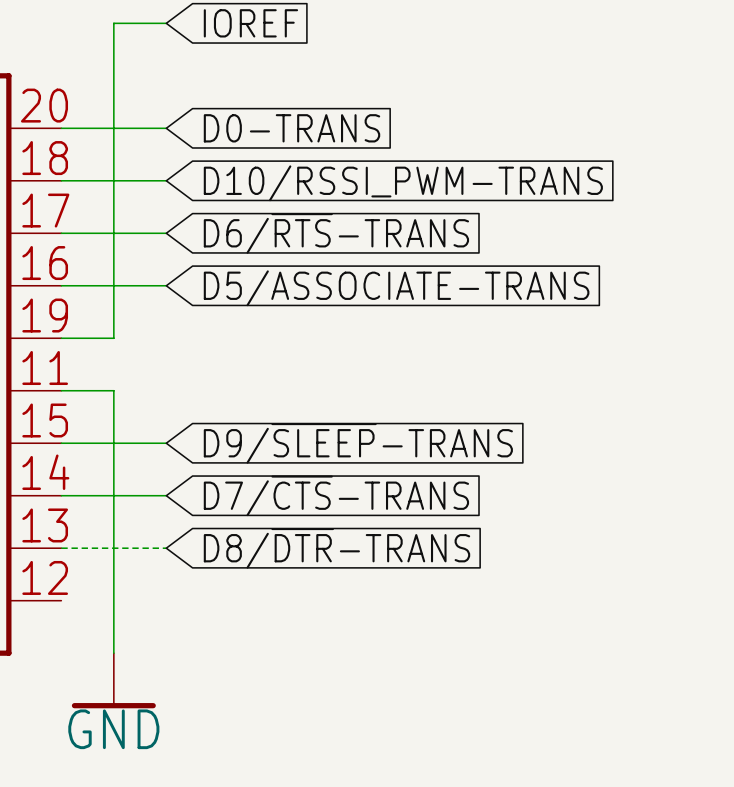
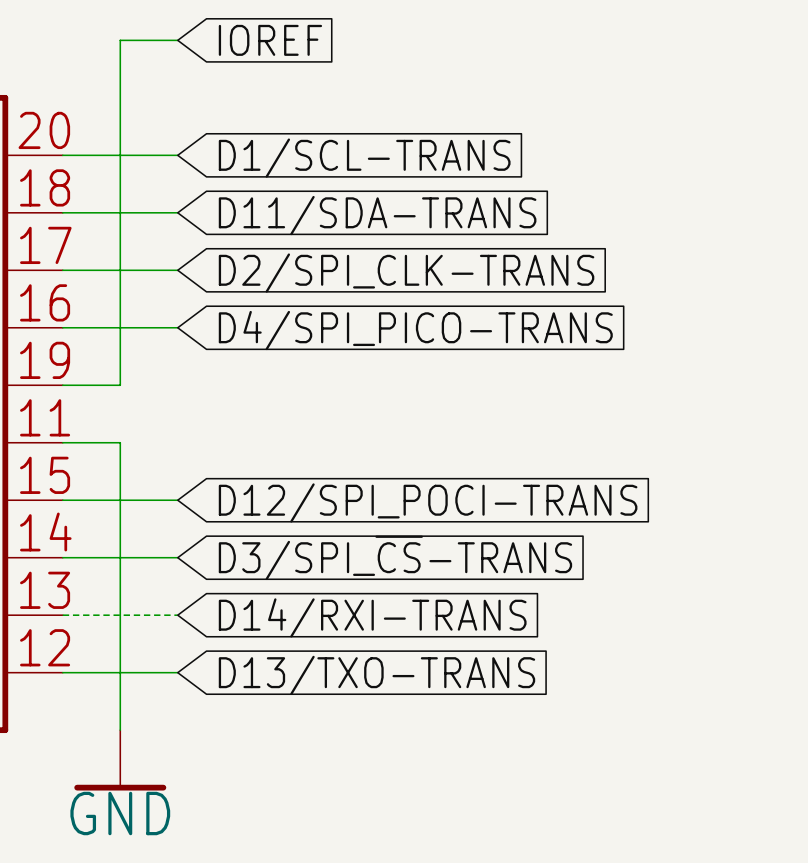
global label: D0-TRANS (291, 128) -> D1/SCL-TRANS (364, 158)
global label: D10/RSSI_PWM-TRANS (403, 183) -> D11/SDA-TRANS (377, 215)
global label: D6/~{RTS}-TRANS (336, 233) -> D2/SPI_CLK-TRANS (406, 273)
global label: D5/ASSOCIATE-TRANS (396, 288) -> D4/SPI_PICO-TRANS (415, 330)
global label: D9/~{SLEEP}-TRANS (358, 443) -> D12/SPI_POCI-TRANS (428, 502)
global label: D7/~{CTS}-TRANS (336, 495) -> D3/SPI_~{CS}-TRANS (395, 557)
global label: D8/~{DTR}-TRANS (336, 548) -> D14/RXI-TRANS (372, 617)
wire: none -> (62, 672) (177, 672)
global label: none -> D13/TXO-TRANS (376, 675)

